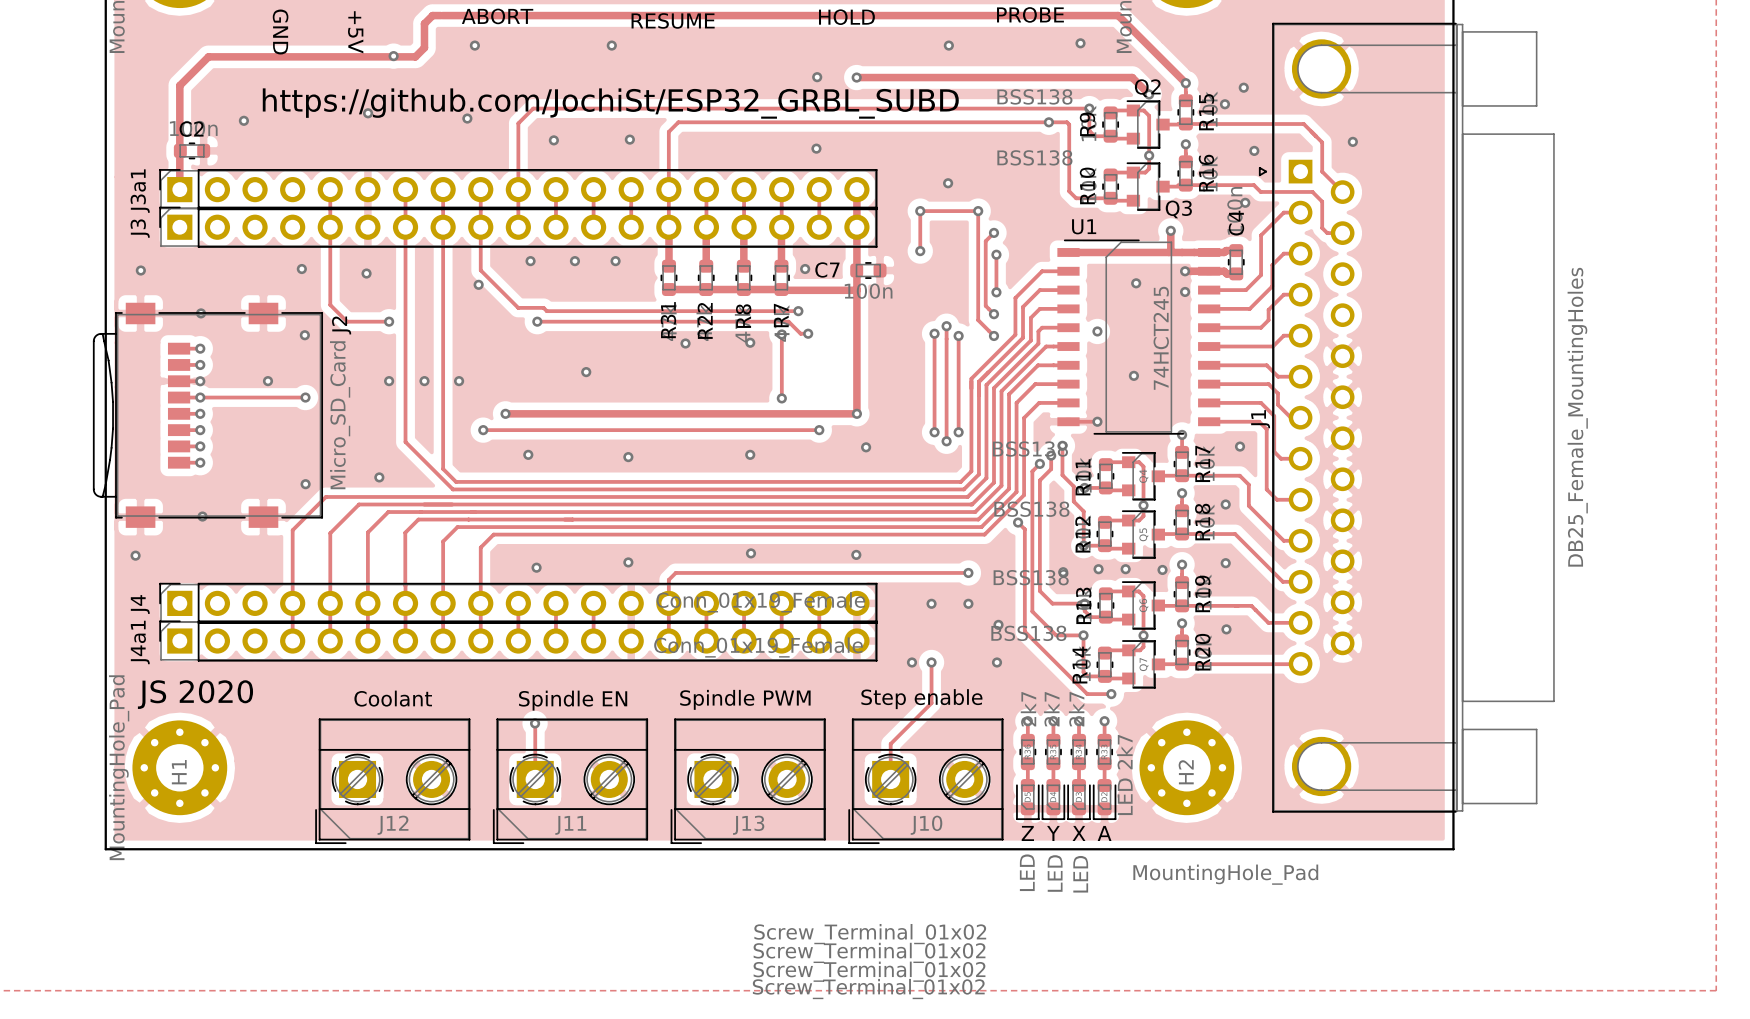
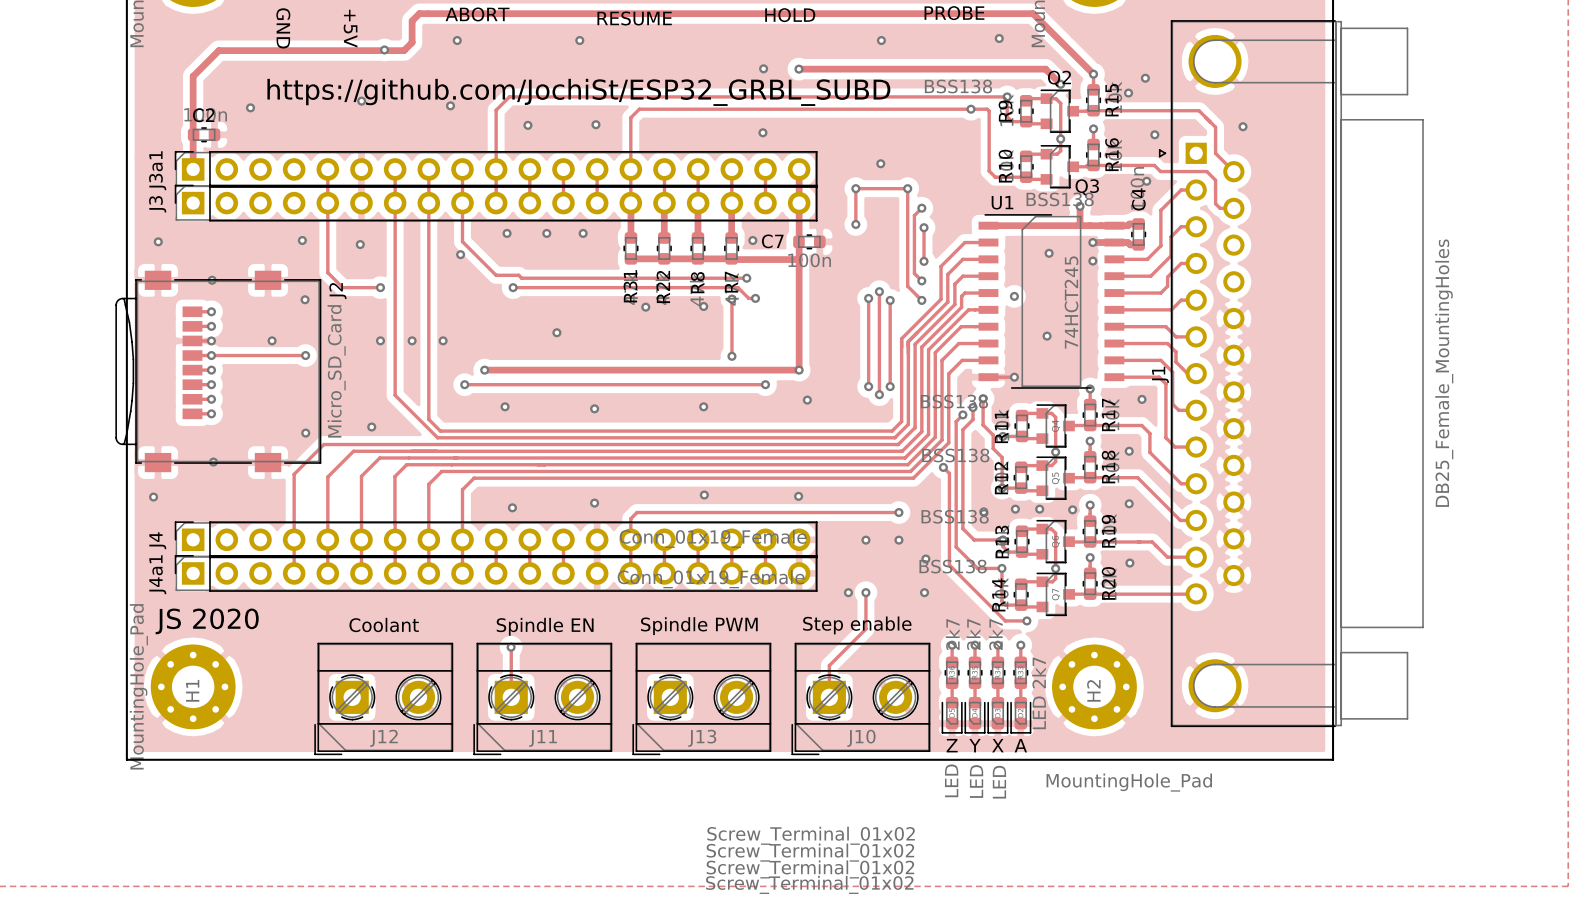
Q3 value position: BSS138 (1034, 157) -> BSS138 (1060, 199)

